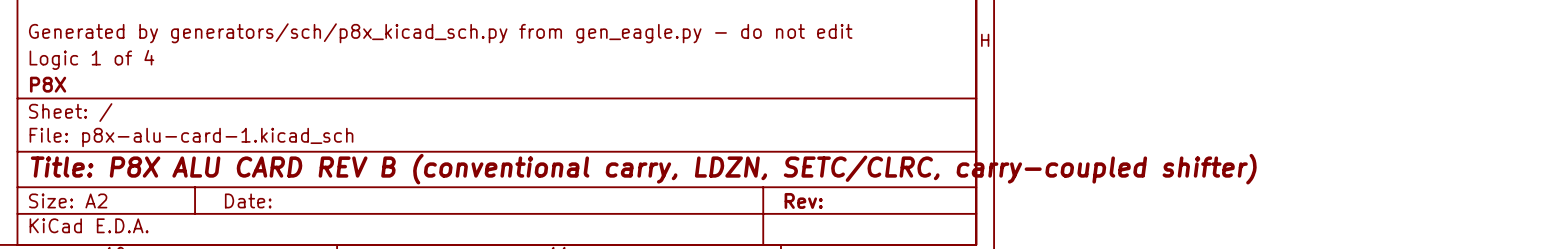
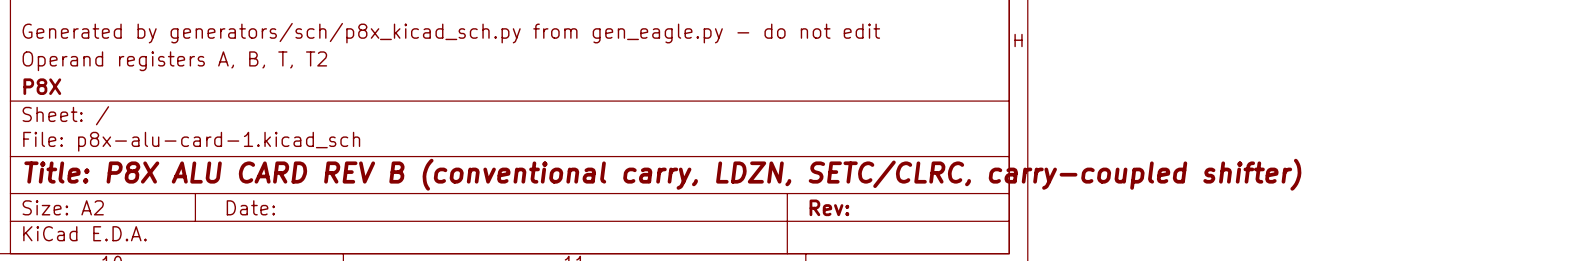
title block: Logic 1 of 4 (91, 59) -> Operand registers A, B, T, T2 (174, 61)

